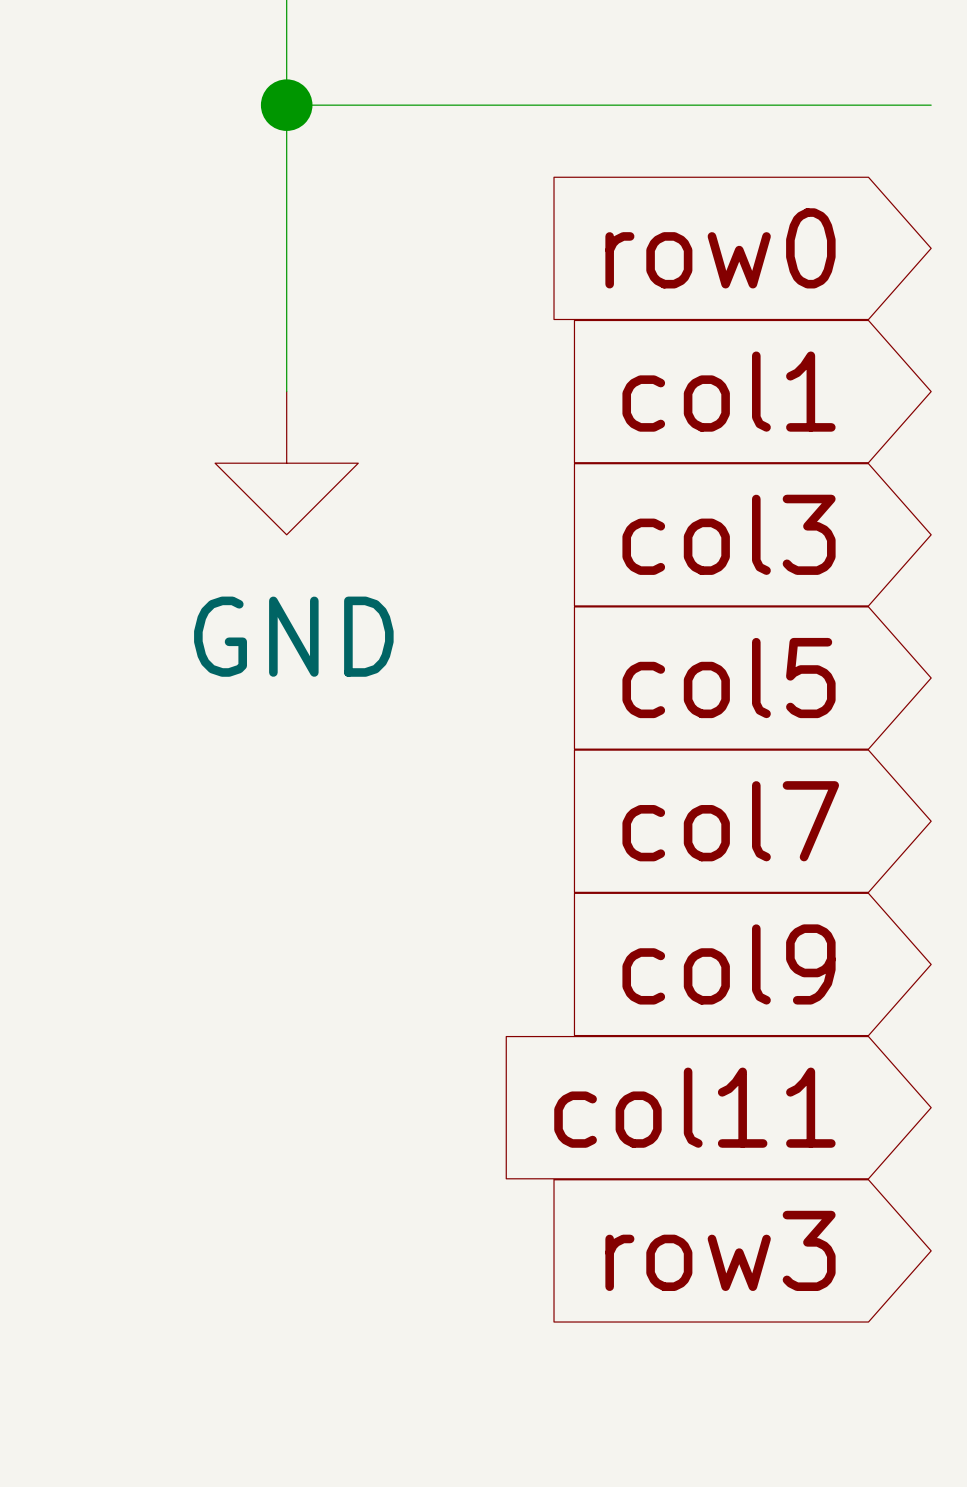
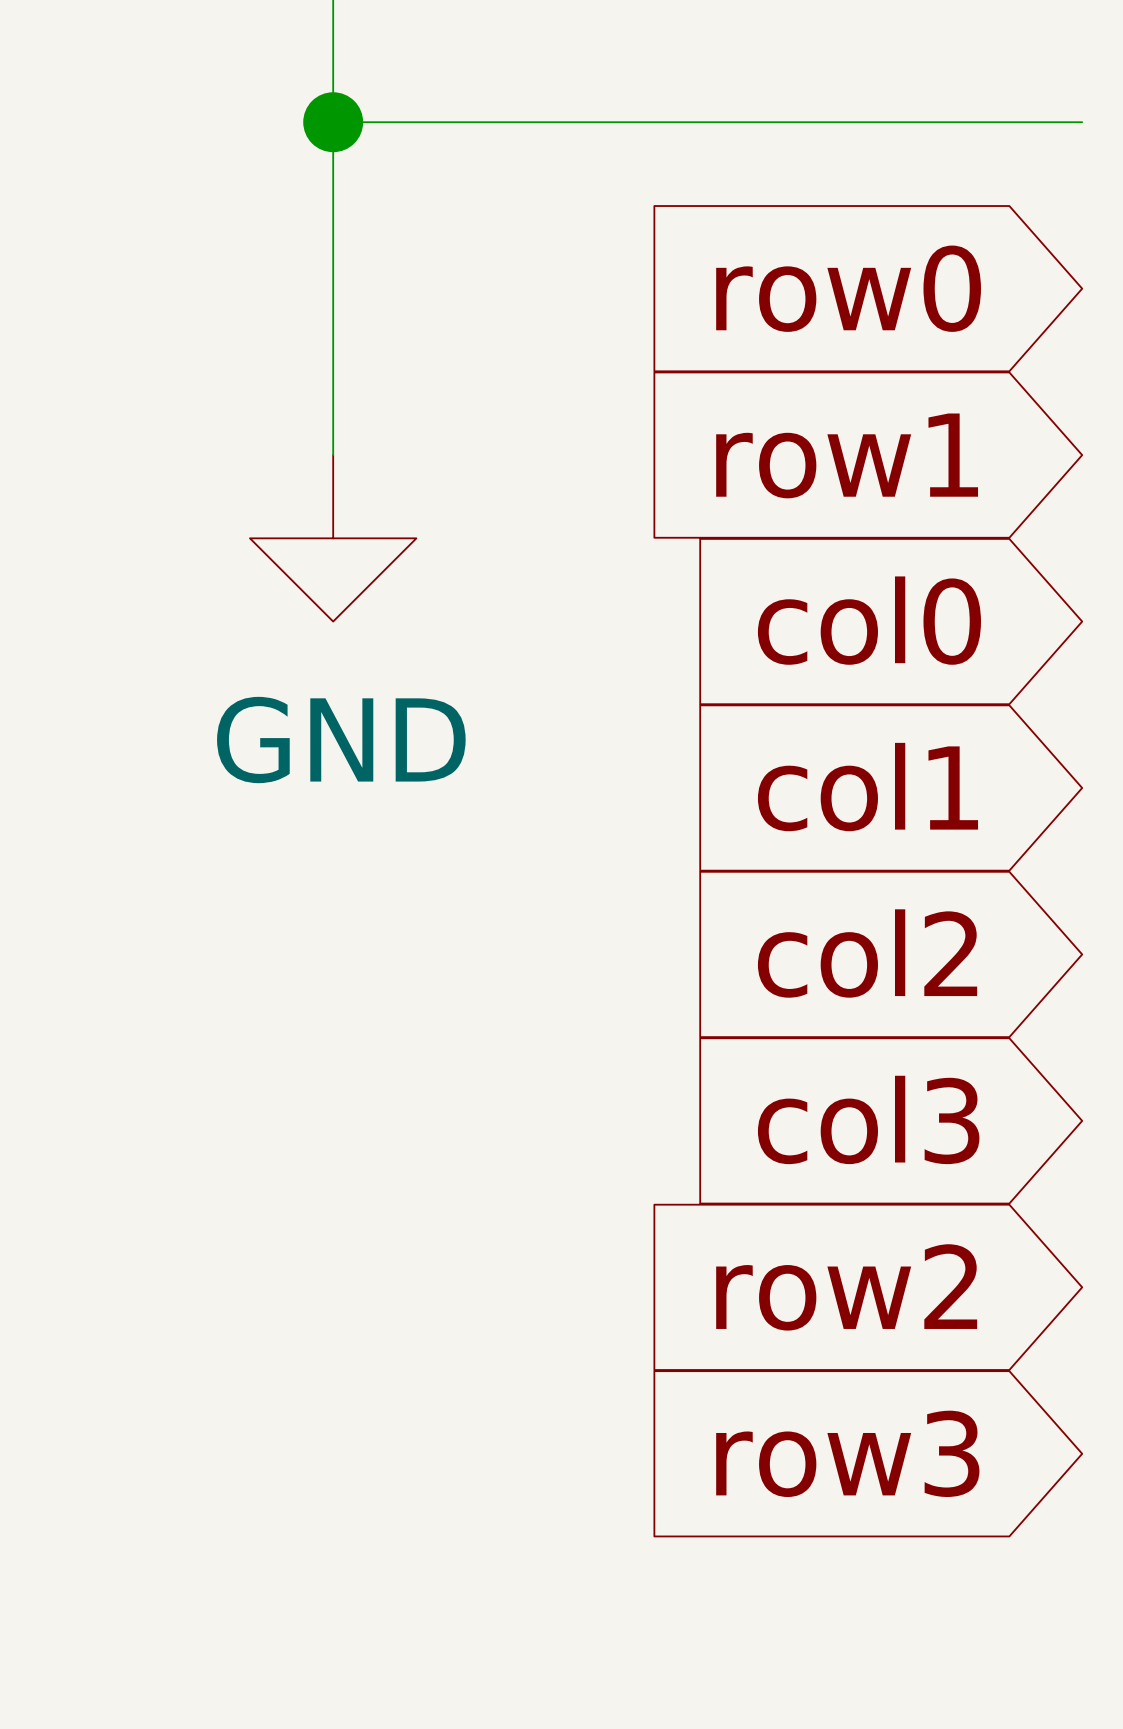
global label: col1 (729, 391) -> row1 (847, 455)
global label: col3 (729, 534) -> col0 (869, 620)
global label: col5 (729, 678) -> col1 (867, 787)
global label: col7 (730, 821) -> col2 (867, 953)
global label: col9 (729, 964) -> col3 (868, 1119)
global label: col11 (694, 1107) -> row2 (846, 1287)

